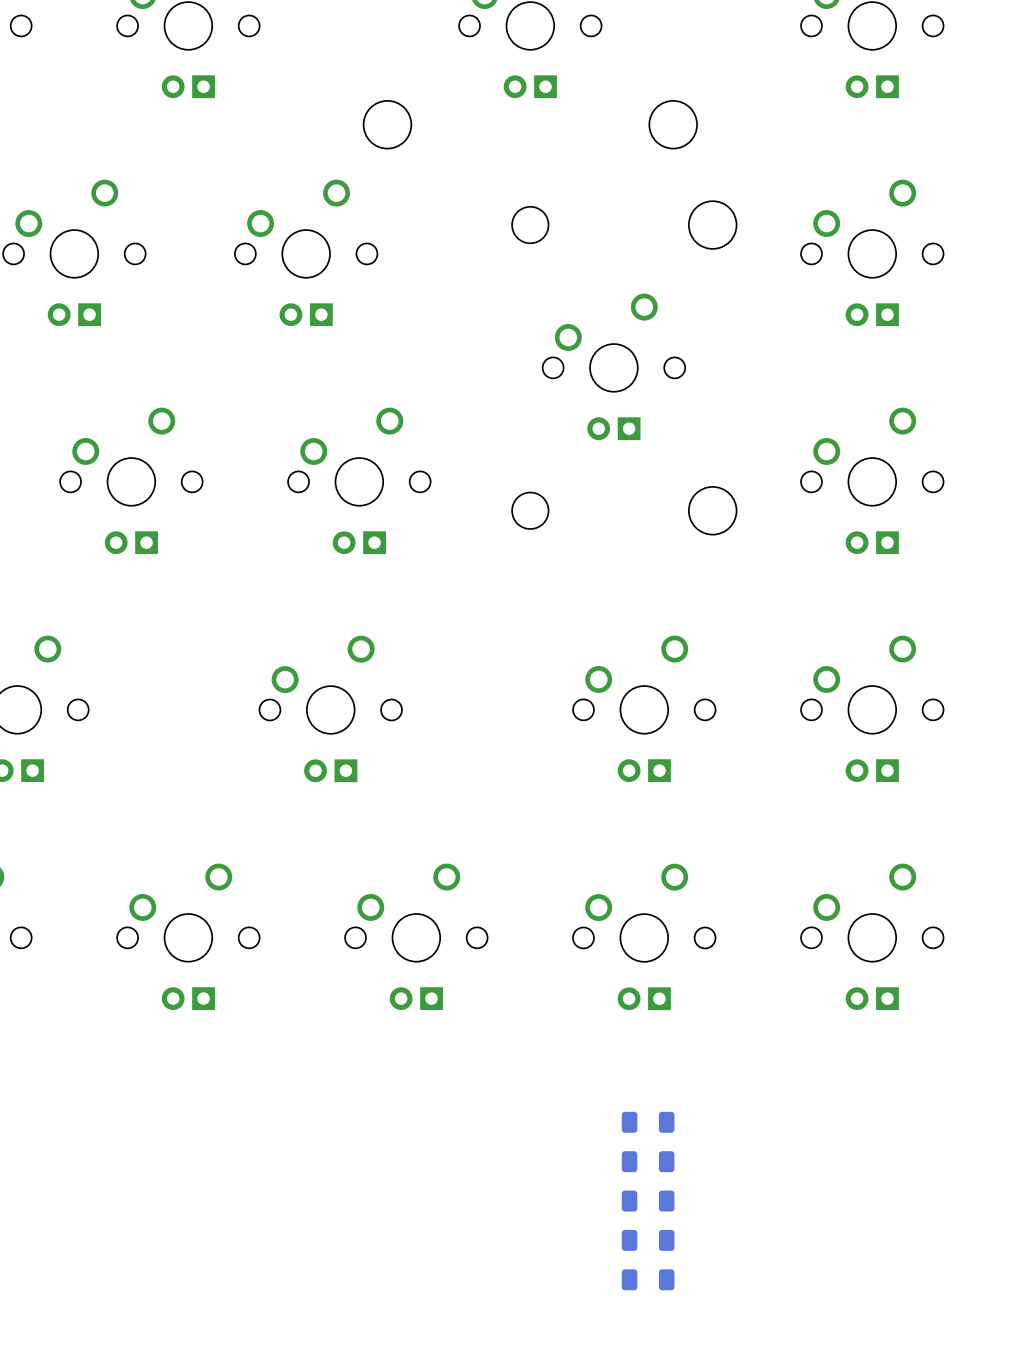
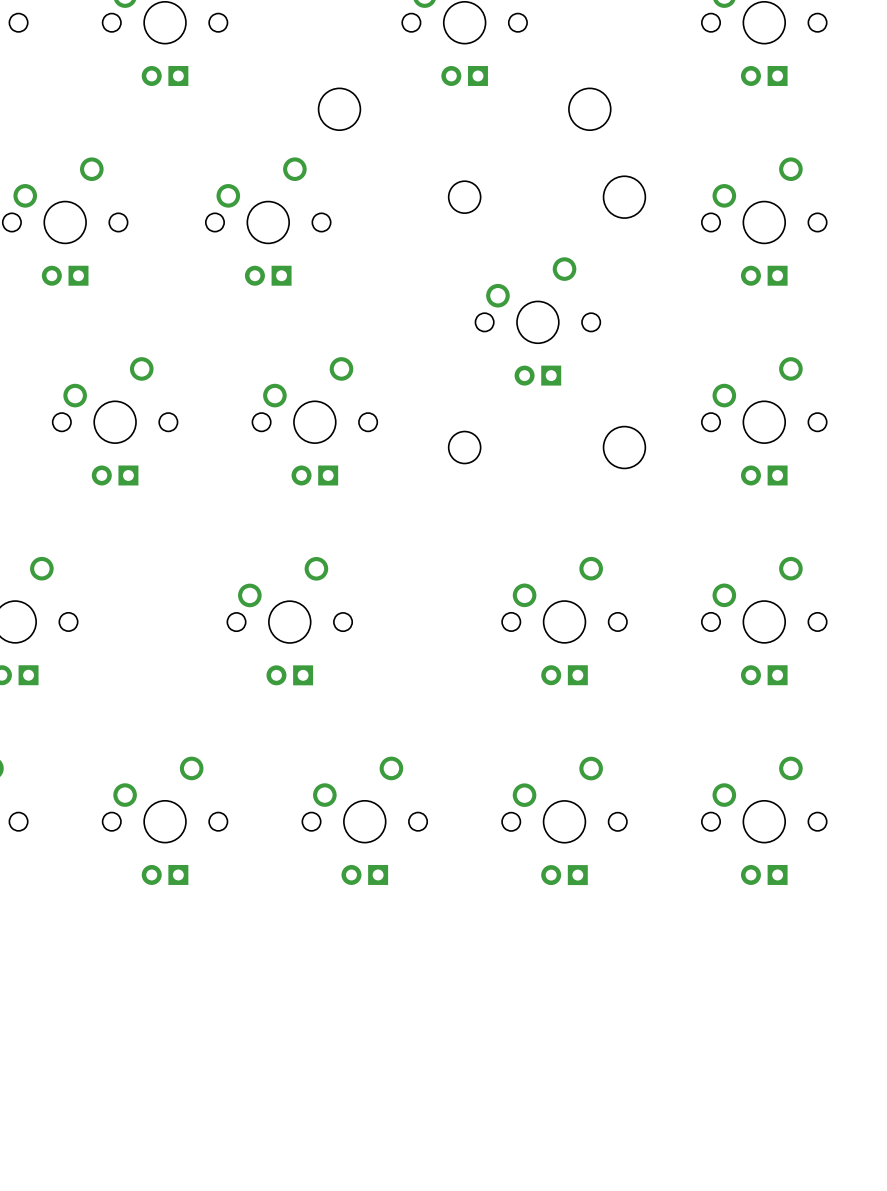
part: (648, 1122) -> none
part: (648, 1161) -> none
part: (648, 1201) -> none
part: (648, 1240) -> none
part: (648, 1279) -> none

